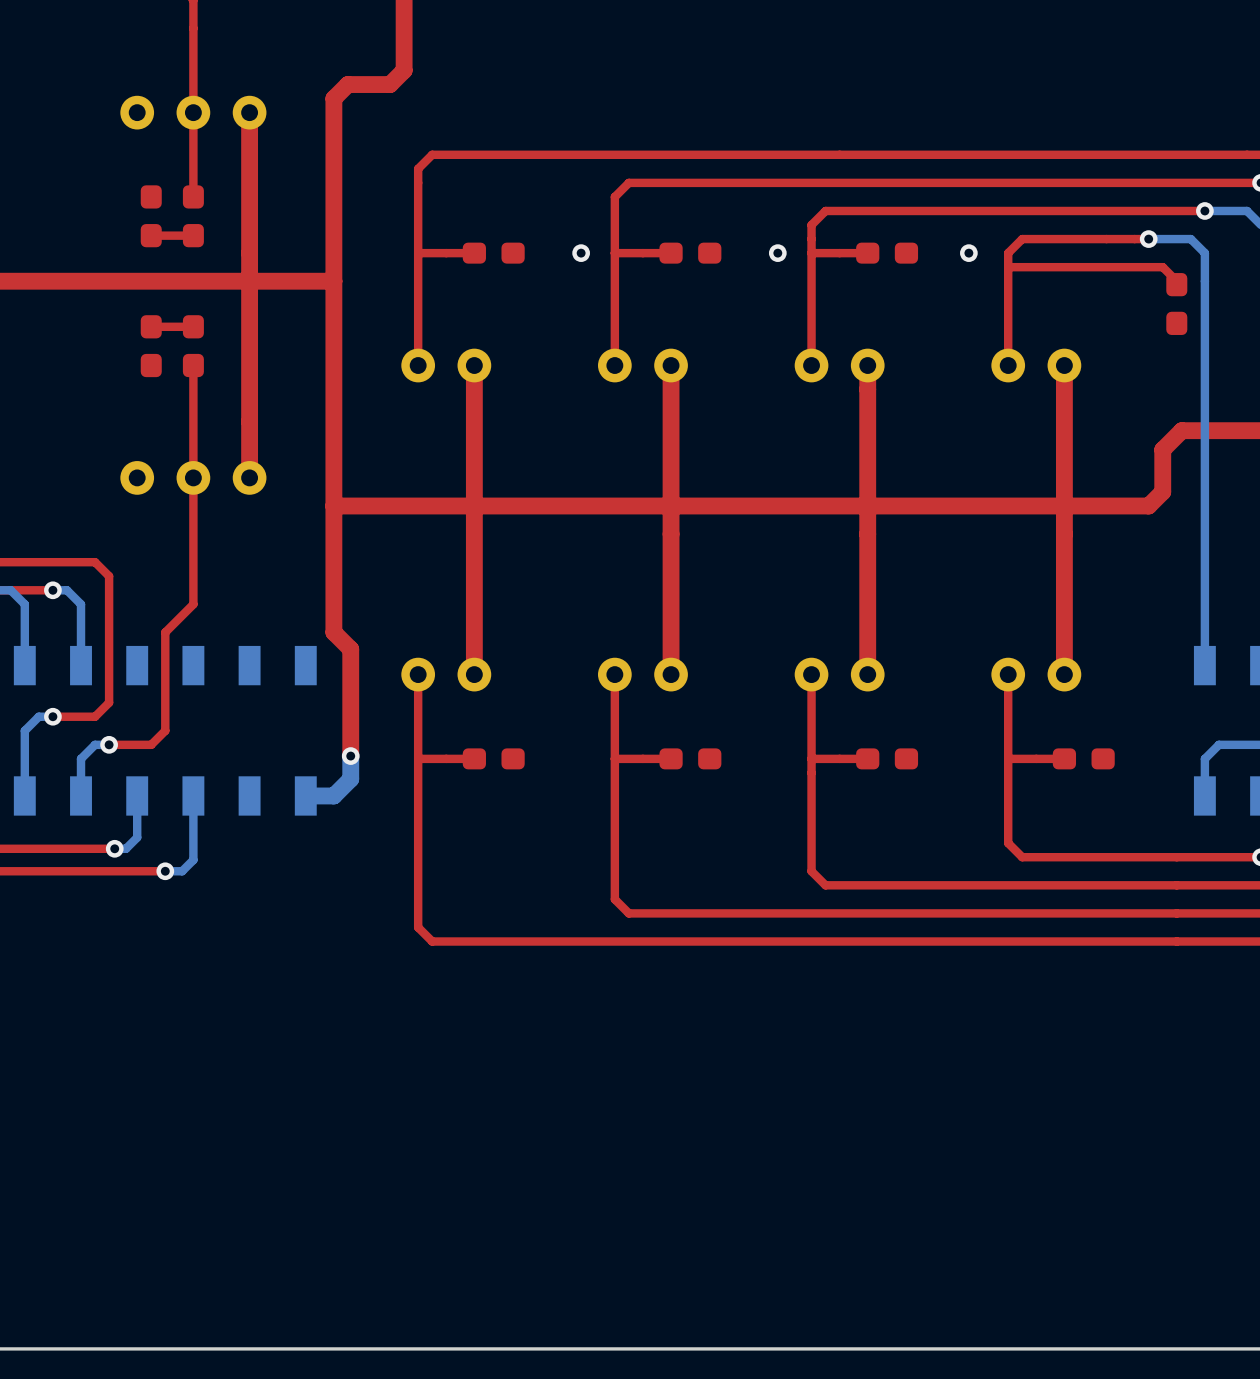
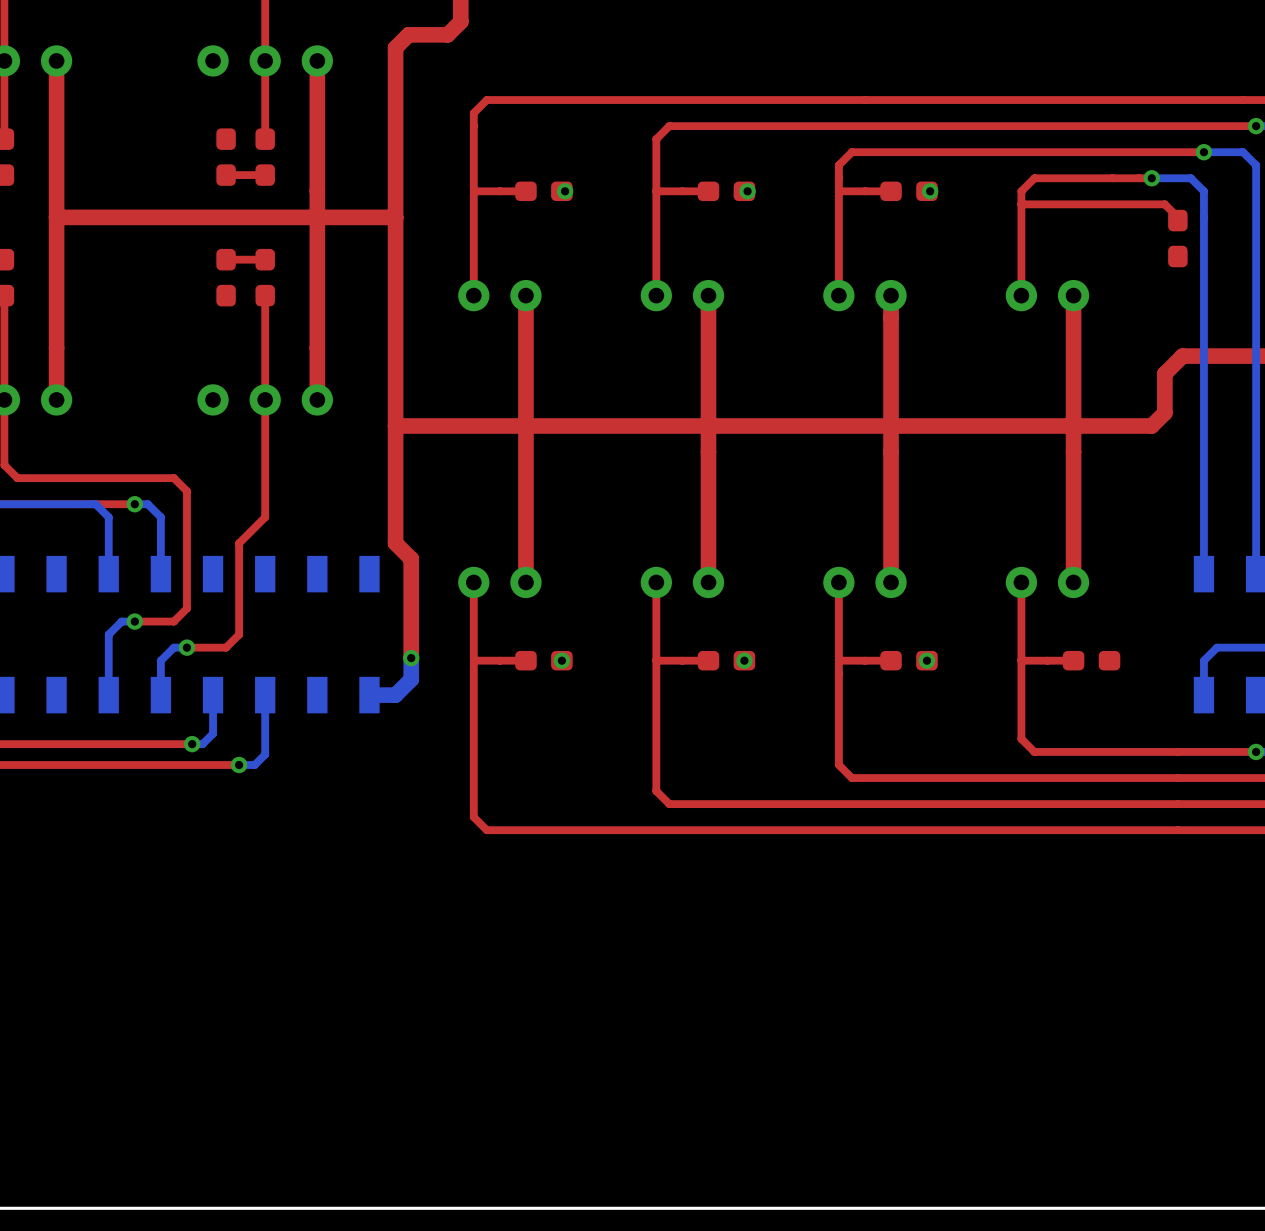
via position: (581, 253) -> (565, 191)
via position: (777, 253) -> (747, 191)
via position: (968, 253) -> (930, 191)
via: none -> (561, 660)
via: none -> (744, 660)
via: none -> (926, 660)

